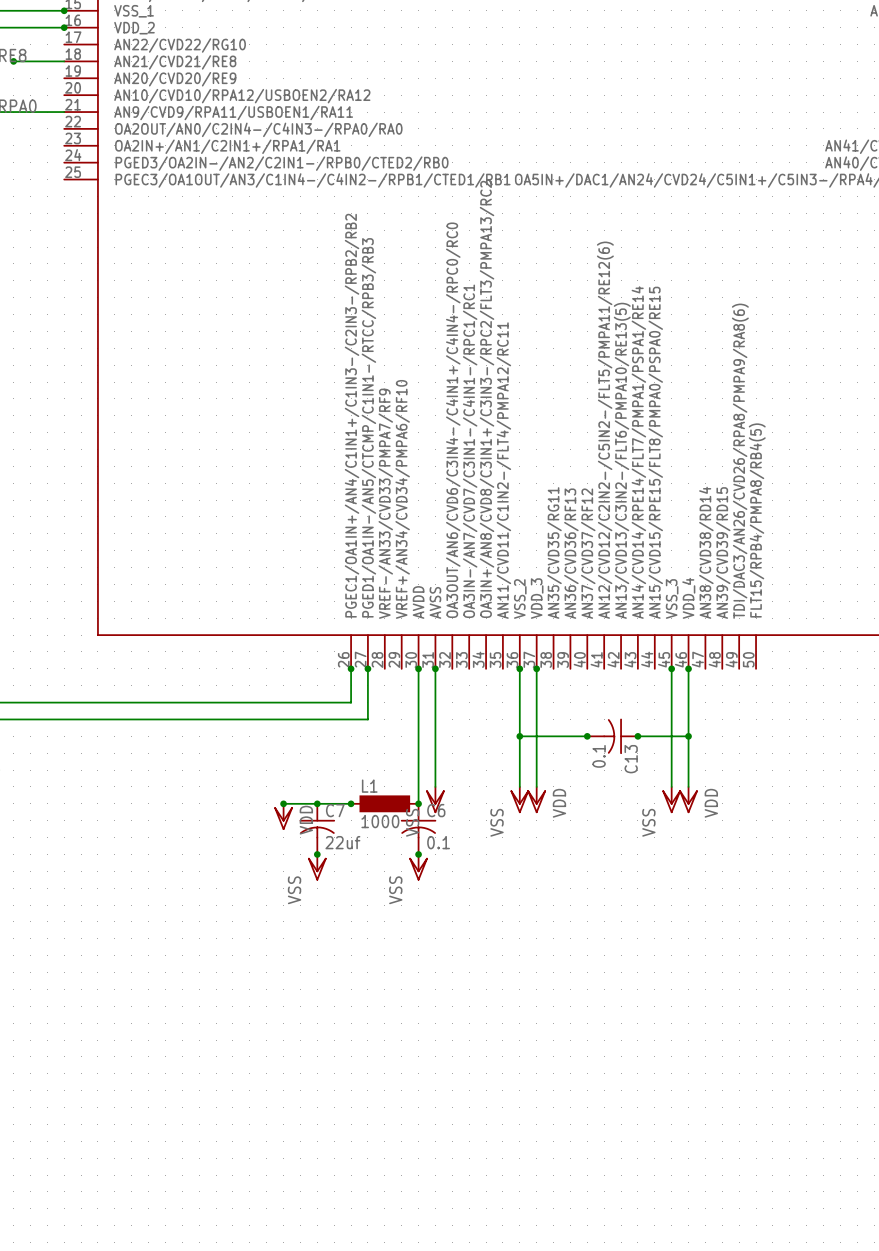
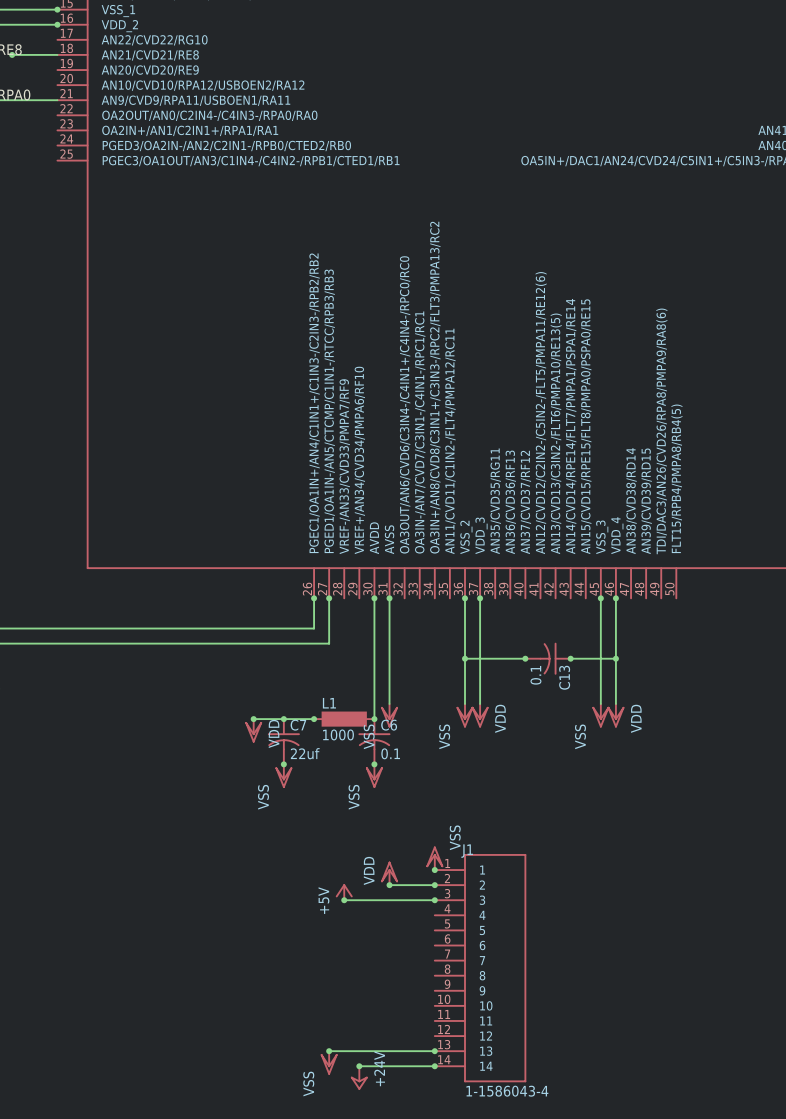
power symbol: none -> VSS (434, 858)
junction: none -> (434, 870)
power symbol: none -> VDD (389, 873)
wire: none -> (389, 885) (434, 885)
junction: none -> (389, 885)
junction: none -> (434, 885)
power symbol: none -> +5V (344, 892)
wire: none -> (344, 900) (434, 900)
junction: none -> (344, 900)
junction: none -> (434, 900)
J1: none -> 1-1586043-4 (480, 968)
wire: none -> (329, 1051) (434, 1051)
junction: none -> (329, 1051)
junction: none -> (434, 1051)
power symbol: none -> VSS (329, 1062)
wire: none -> (359, 1066) (434, 1066)
junction: none -> (359, 1066)
junction: none -> (434, 1066)
power symbol: none -> +24V (359, 1077)

